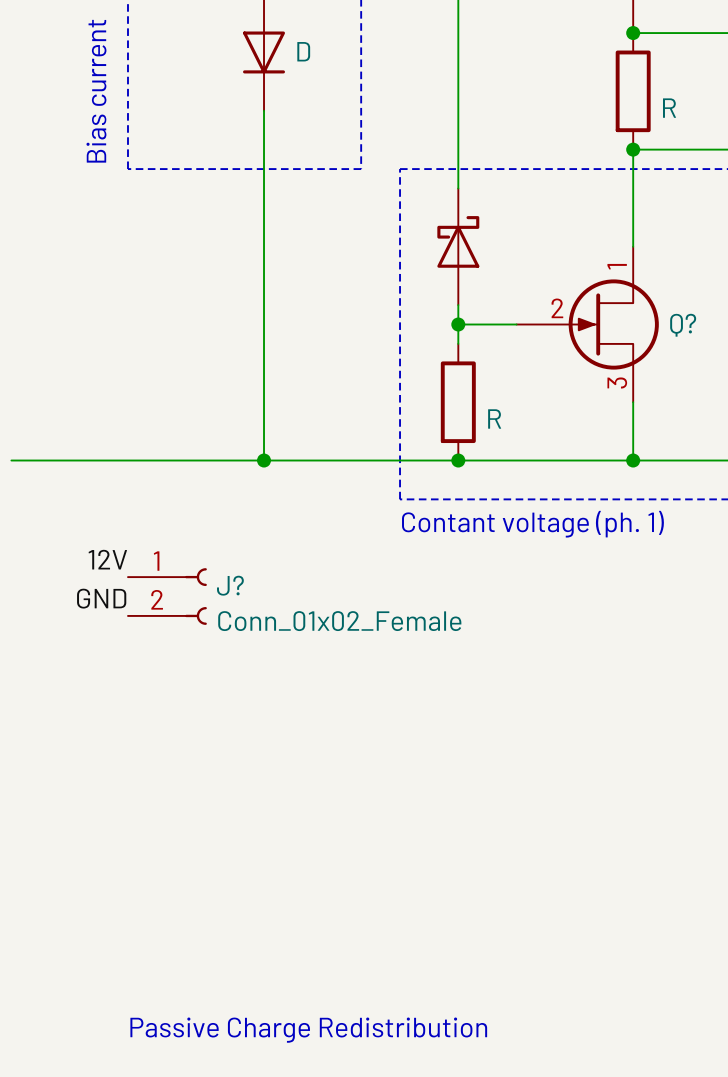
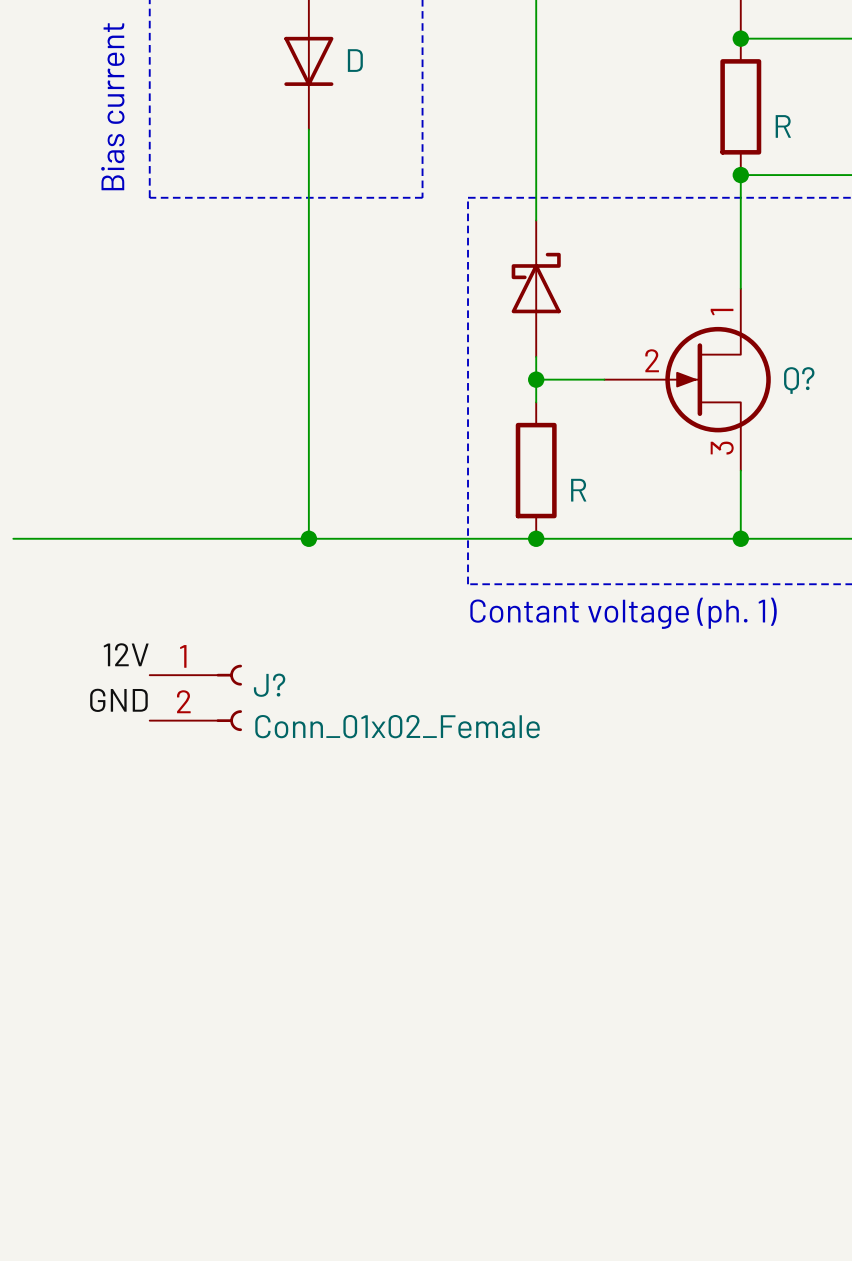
text: Passive Charge Redistribution (308, 1030) -> none

